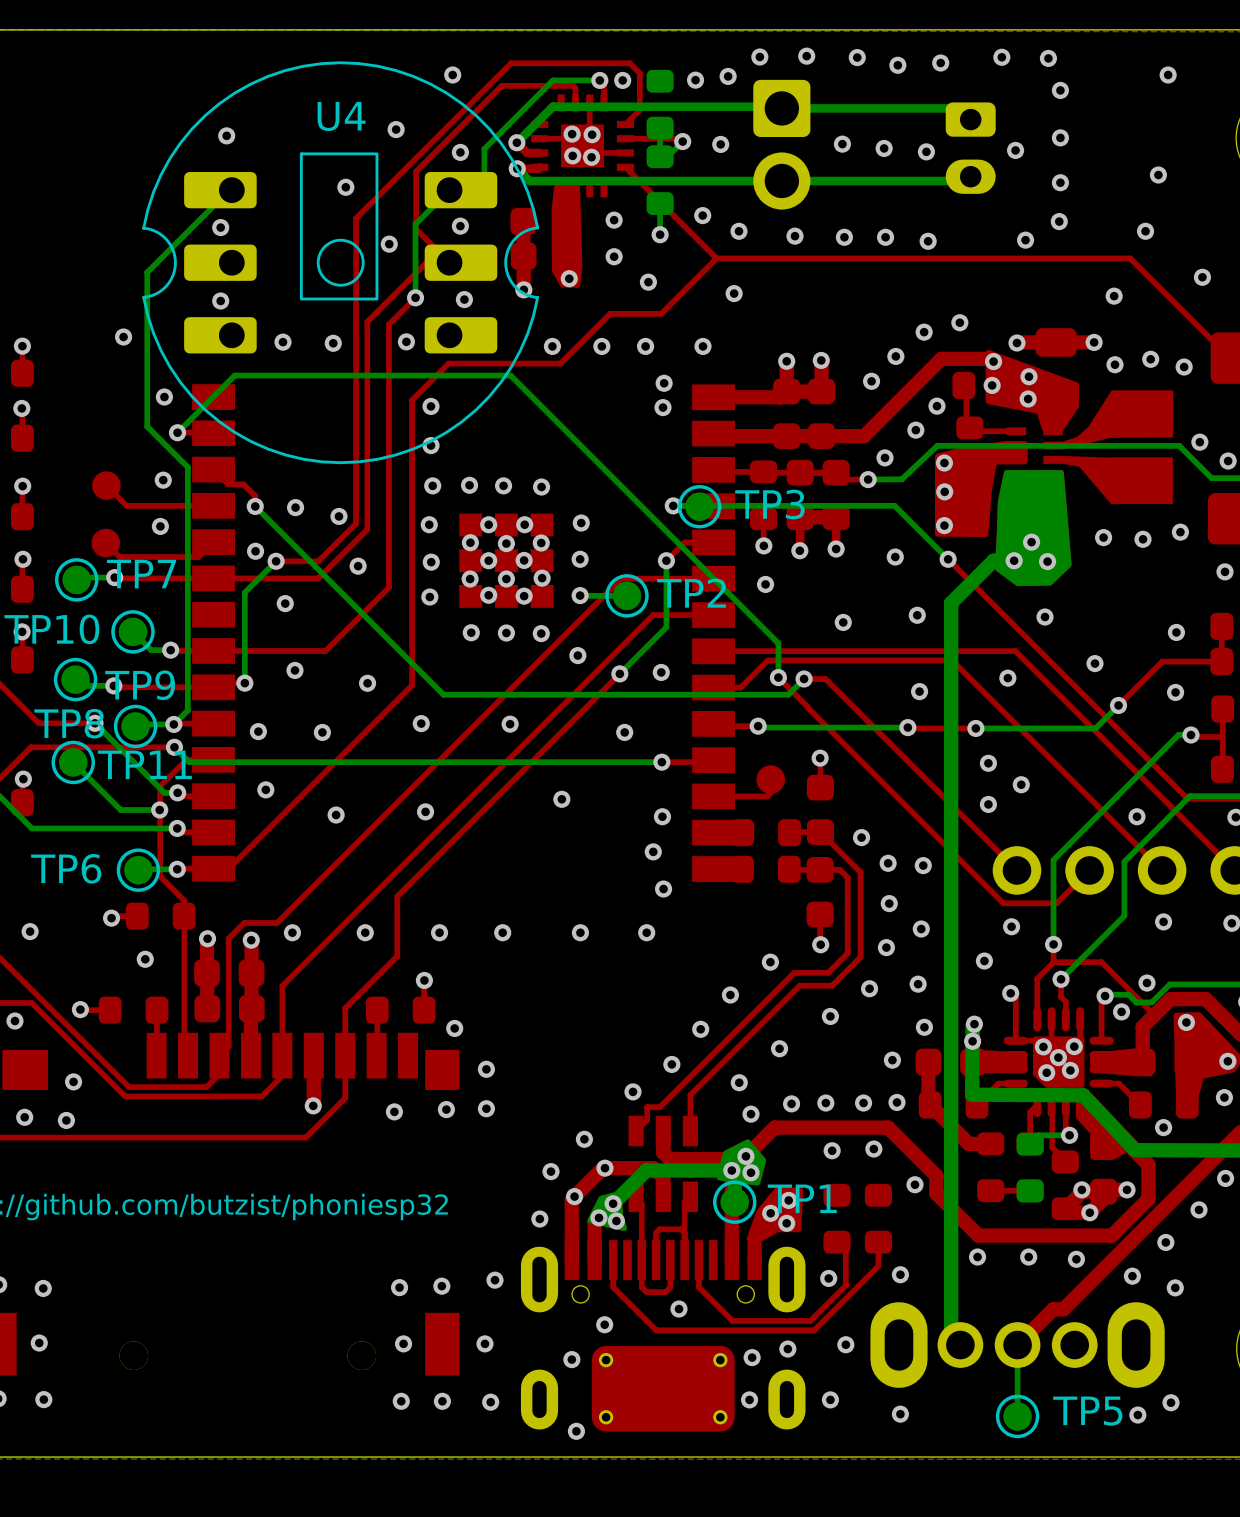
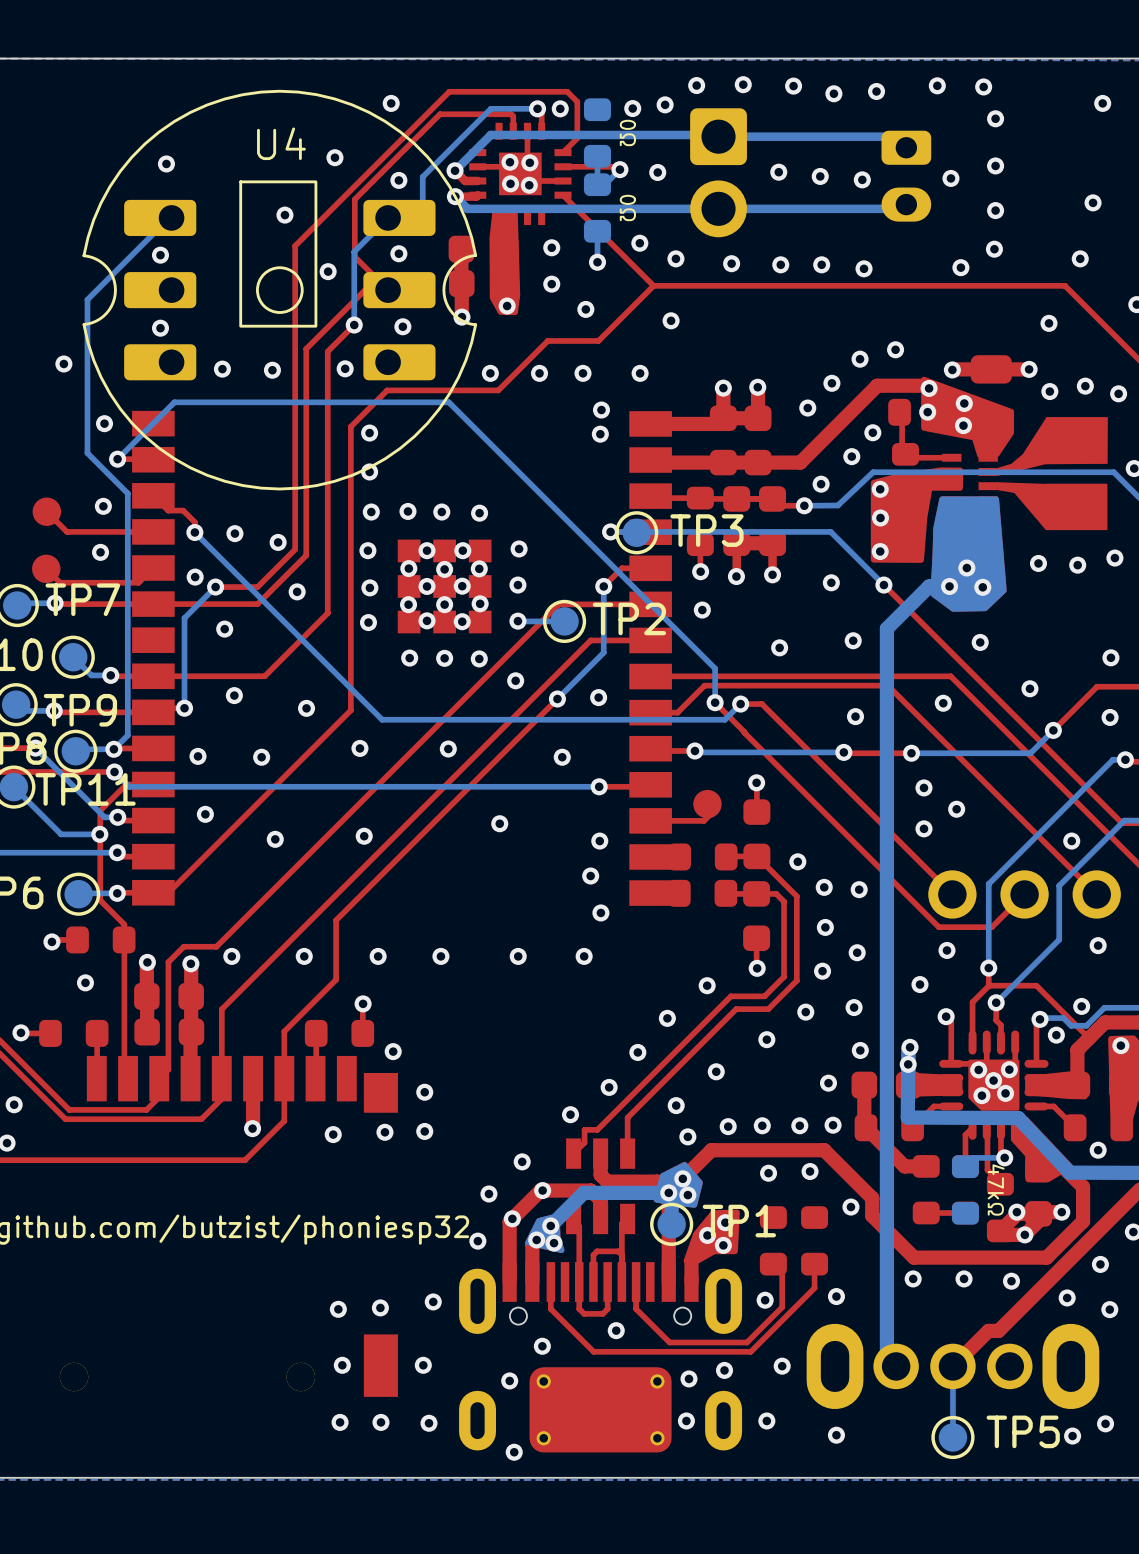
part value: none -> 0Ω (627, 132)
part value: none -> 0Ω (627, 207)
part value: none -> 47kΩ (996, 1189)

